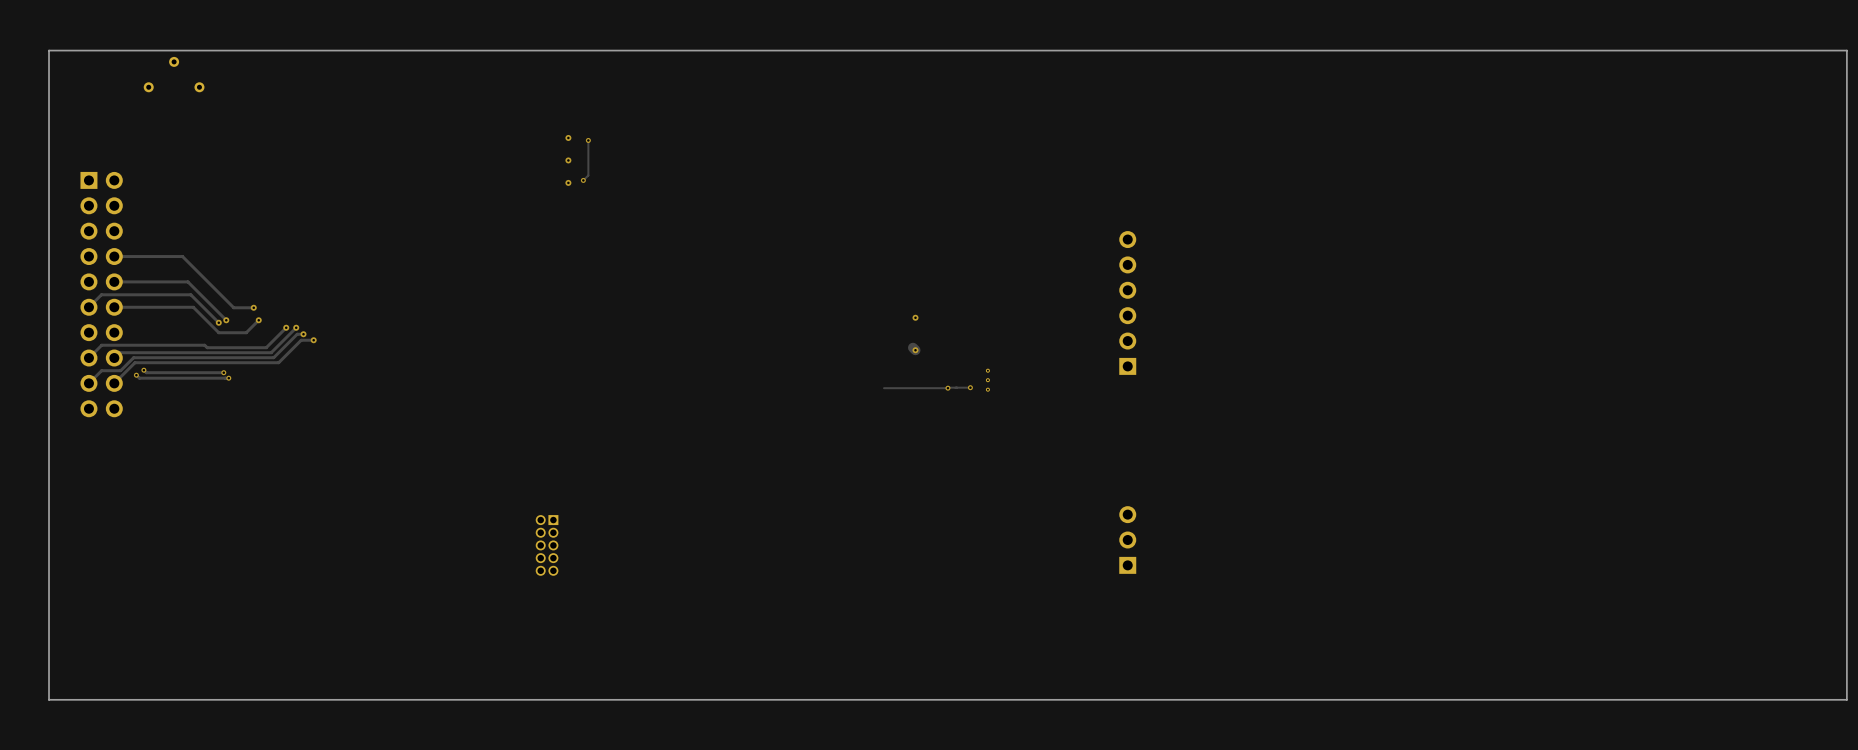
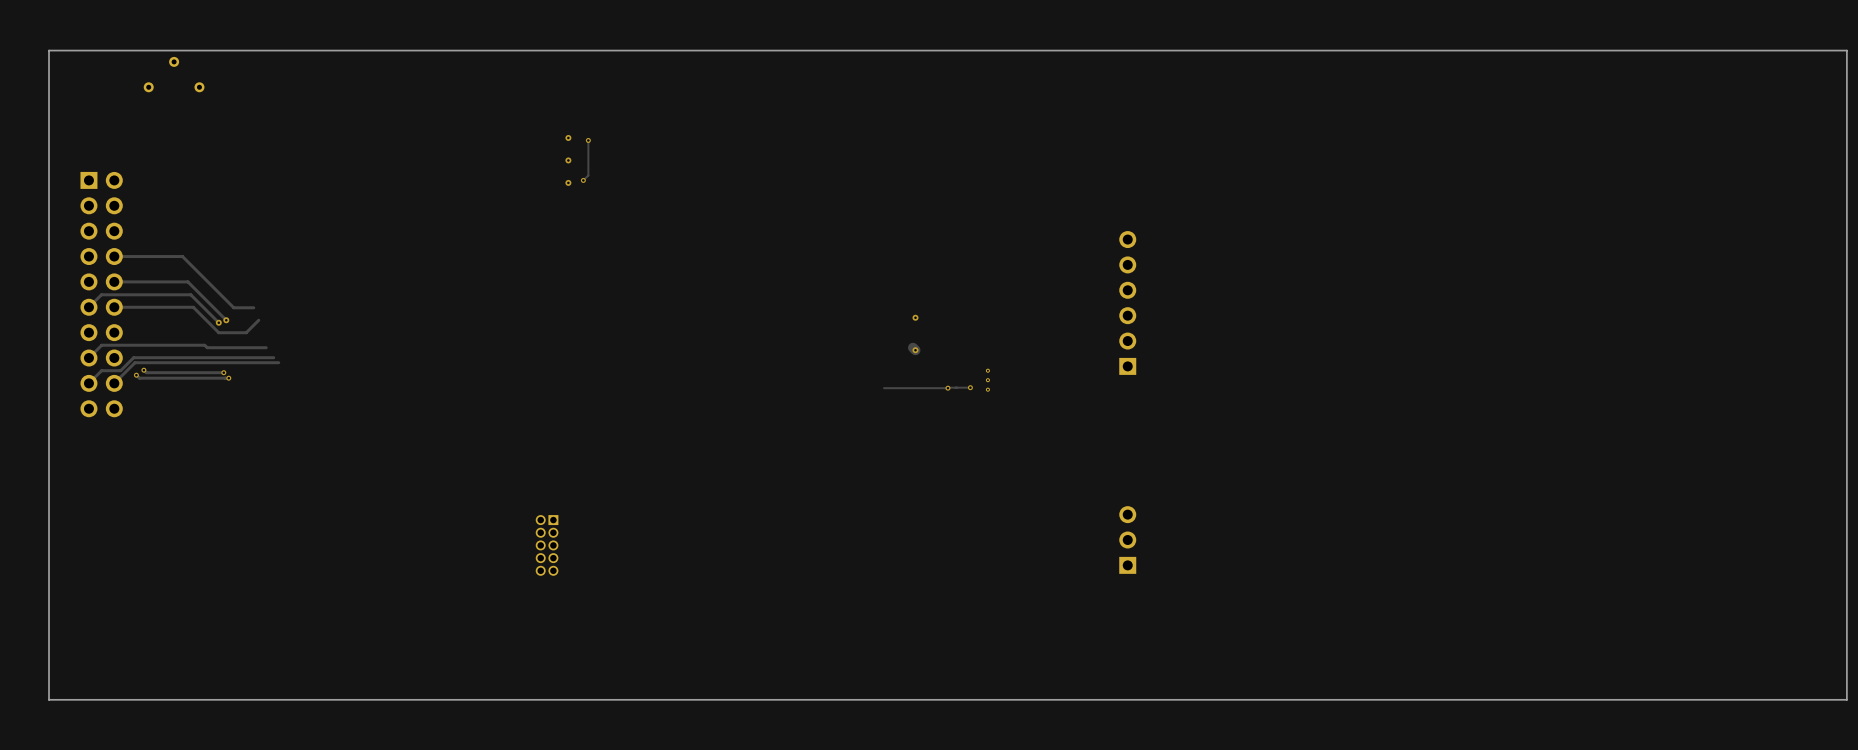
via: (253, 307) -> none
via: (258, 320) -> none
track: (286, 327) (266, 347) -> none
via: (286, 327) -> none
track: (296, 327) (271, 352) (119, 352) -> none
via: (296, 327) -> none
track: (303, 334) (297, 334) (273, 357) -> none
via: (303, 334) -> none
track: (313, 340) (301, 340) (278, 362) -> none
via: (313, 340) -> none

